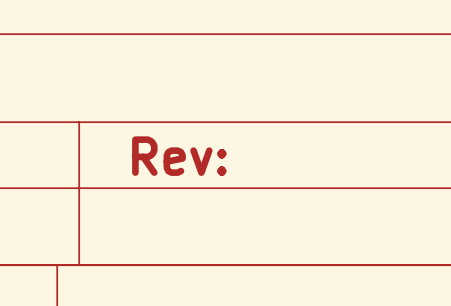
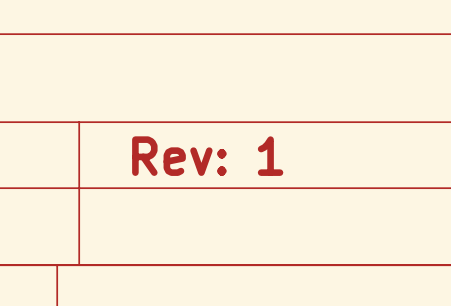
title block: Rev: (179, 156) -> Rev: 1 (207, 156)

